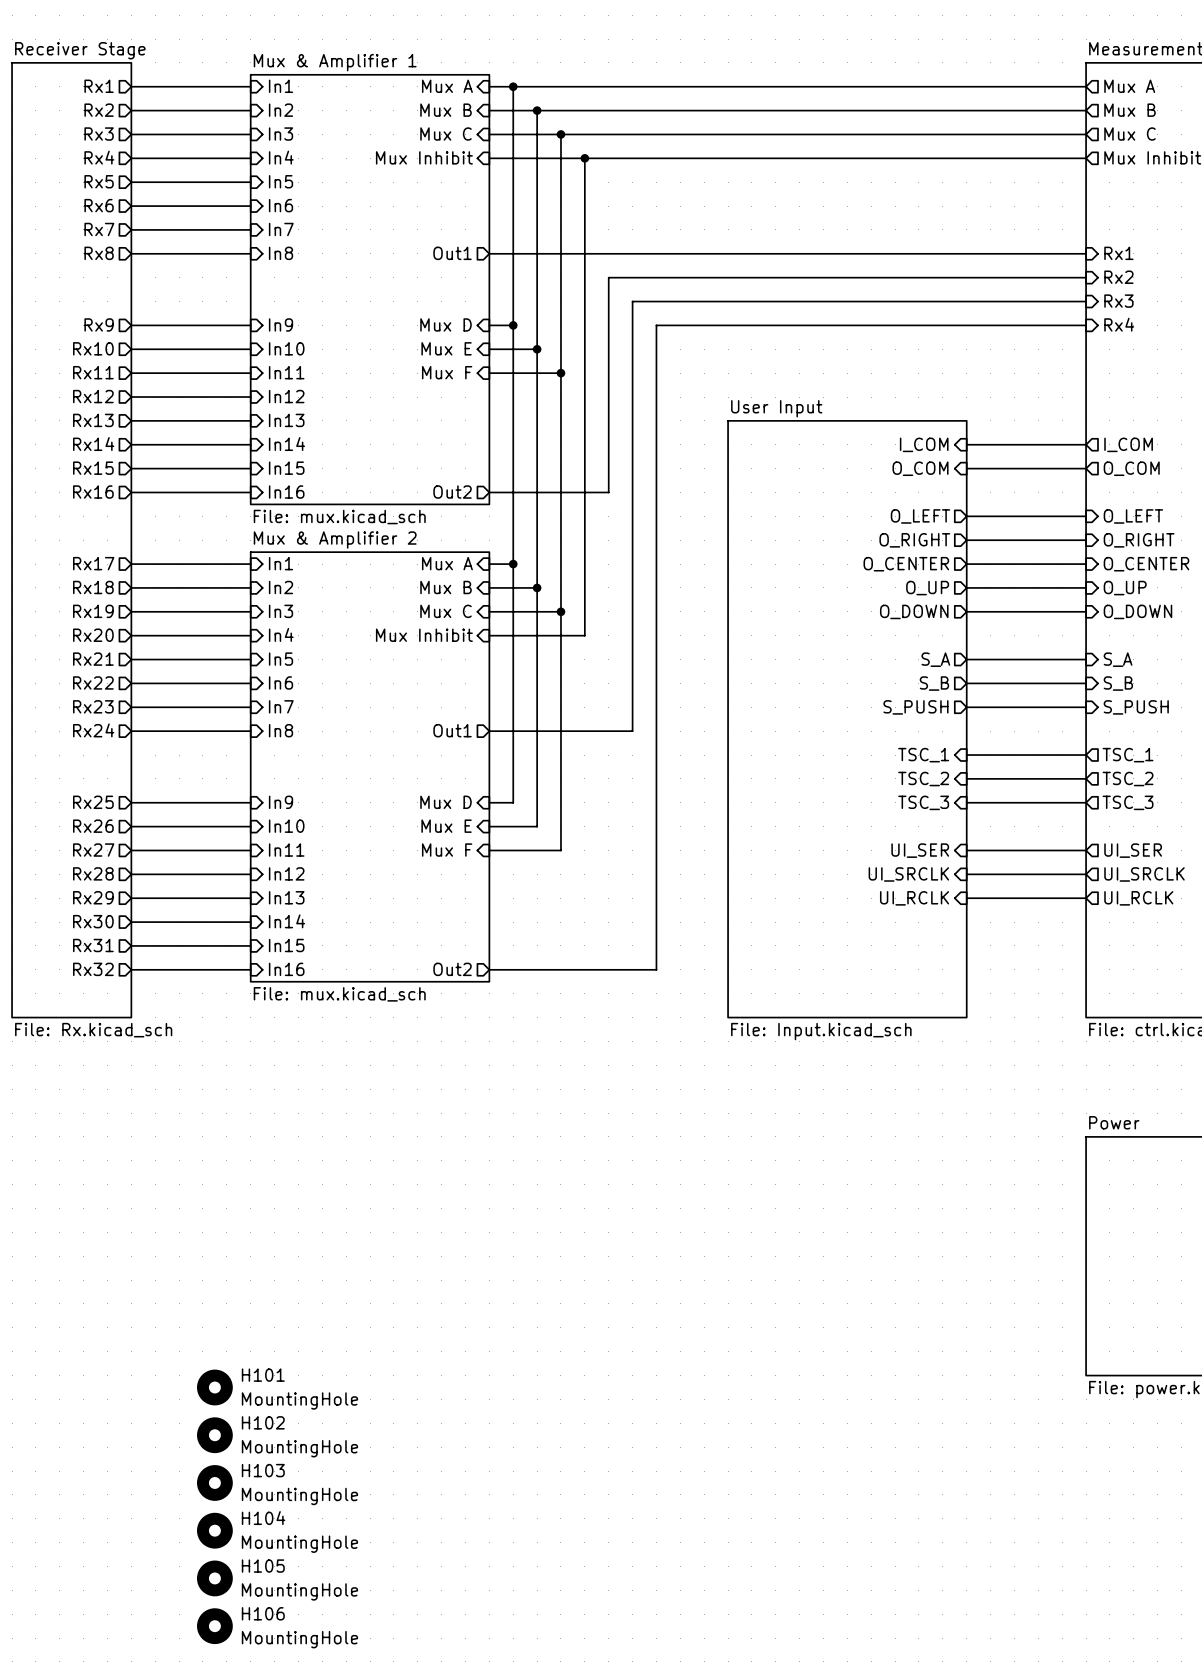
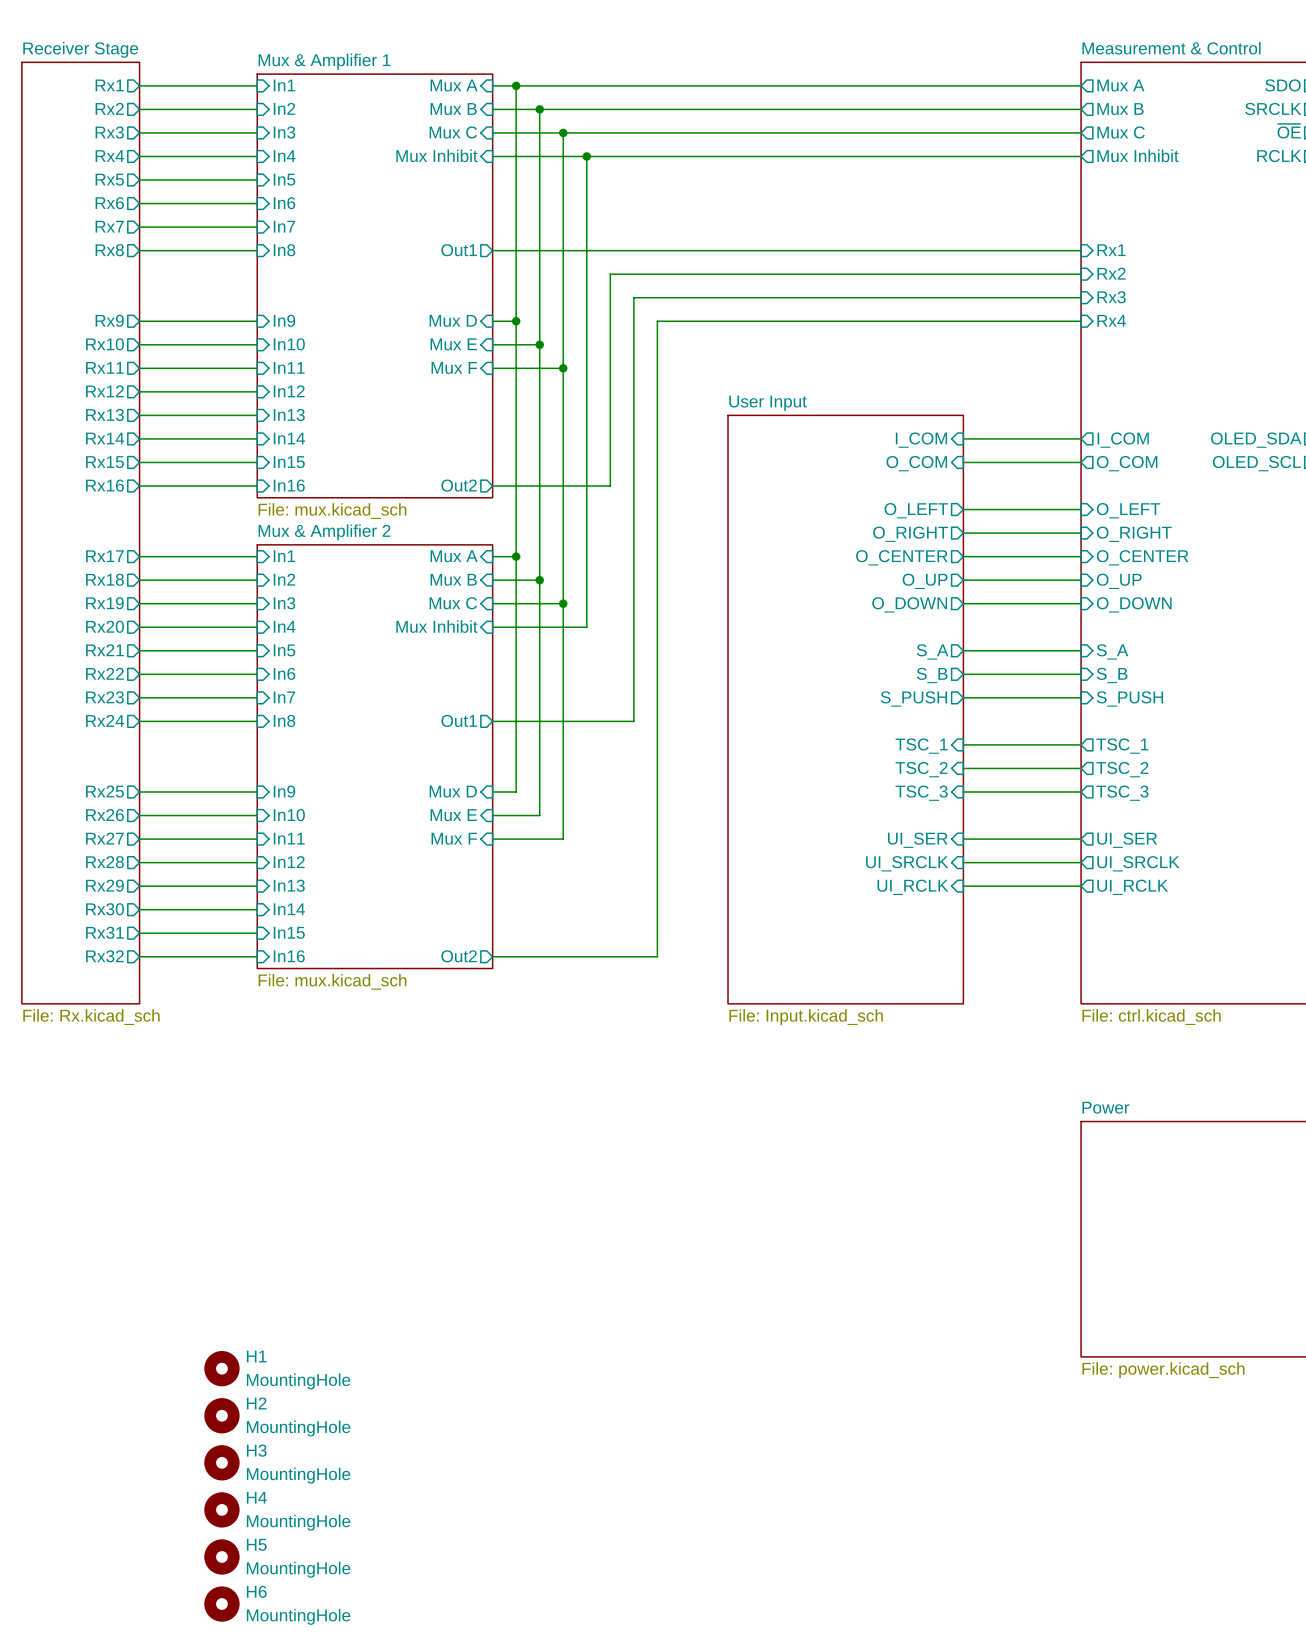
H101 name: H101 (263, 1375) -> H1 (256, 1356)
H102 name: H102 (263, 1422) -> H2 (256, 1403)
H103 name: H103 (263, 1470) -> H3 (256, 1450)
H104 name: H104 (263, 1518) -> H4 (256, 1497)
H105 name: H105 (263, 1566) -> H5 (256, 1544)
H106 name: H106 (263, 1613) -> H6 (256, 1591)

